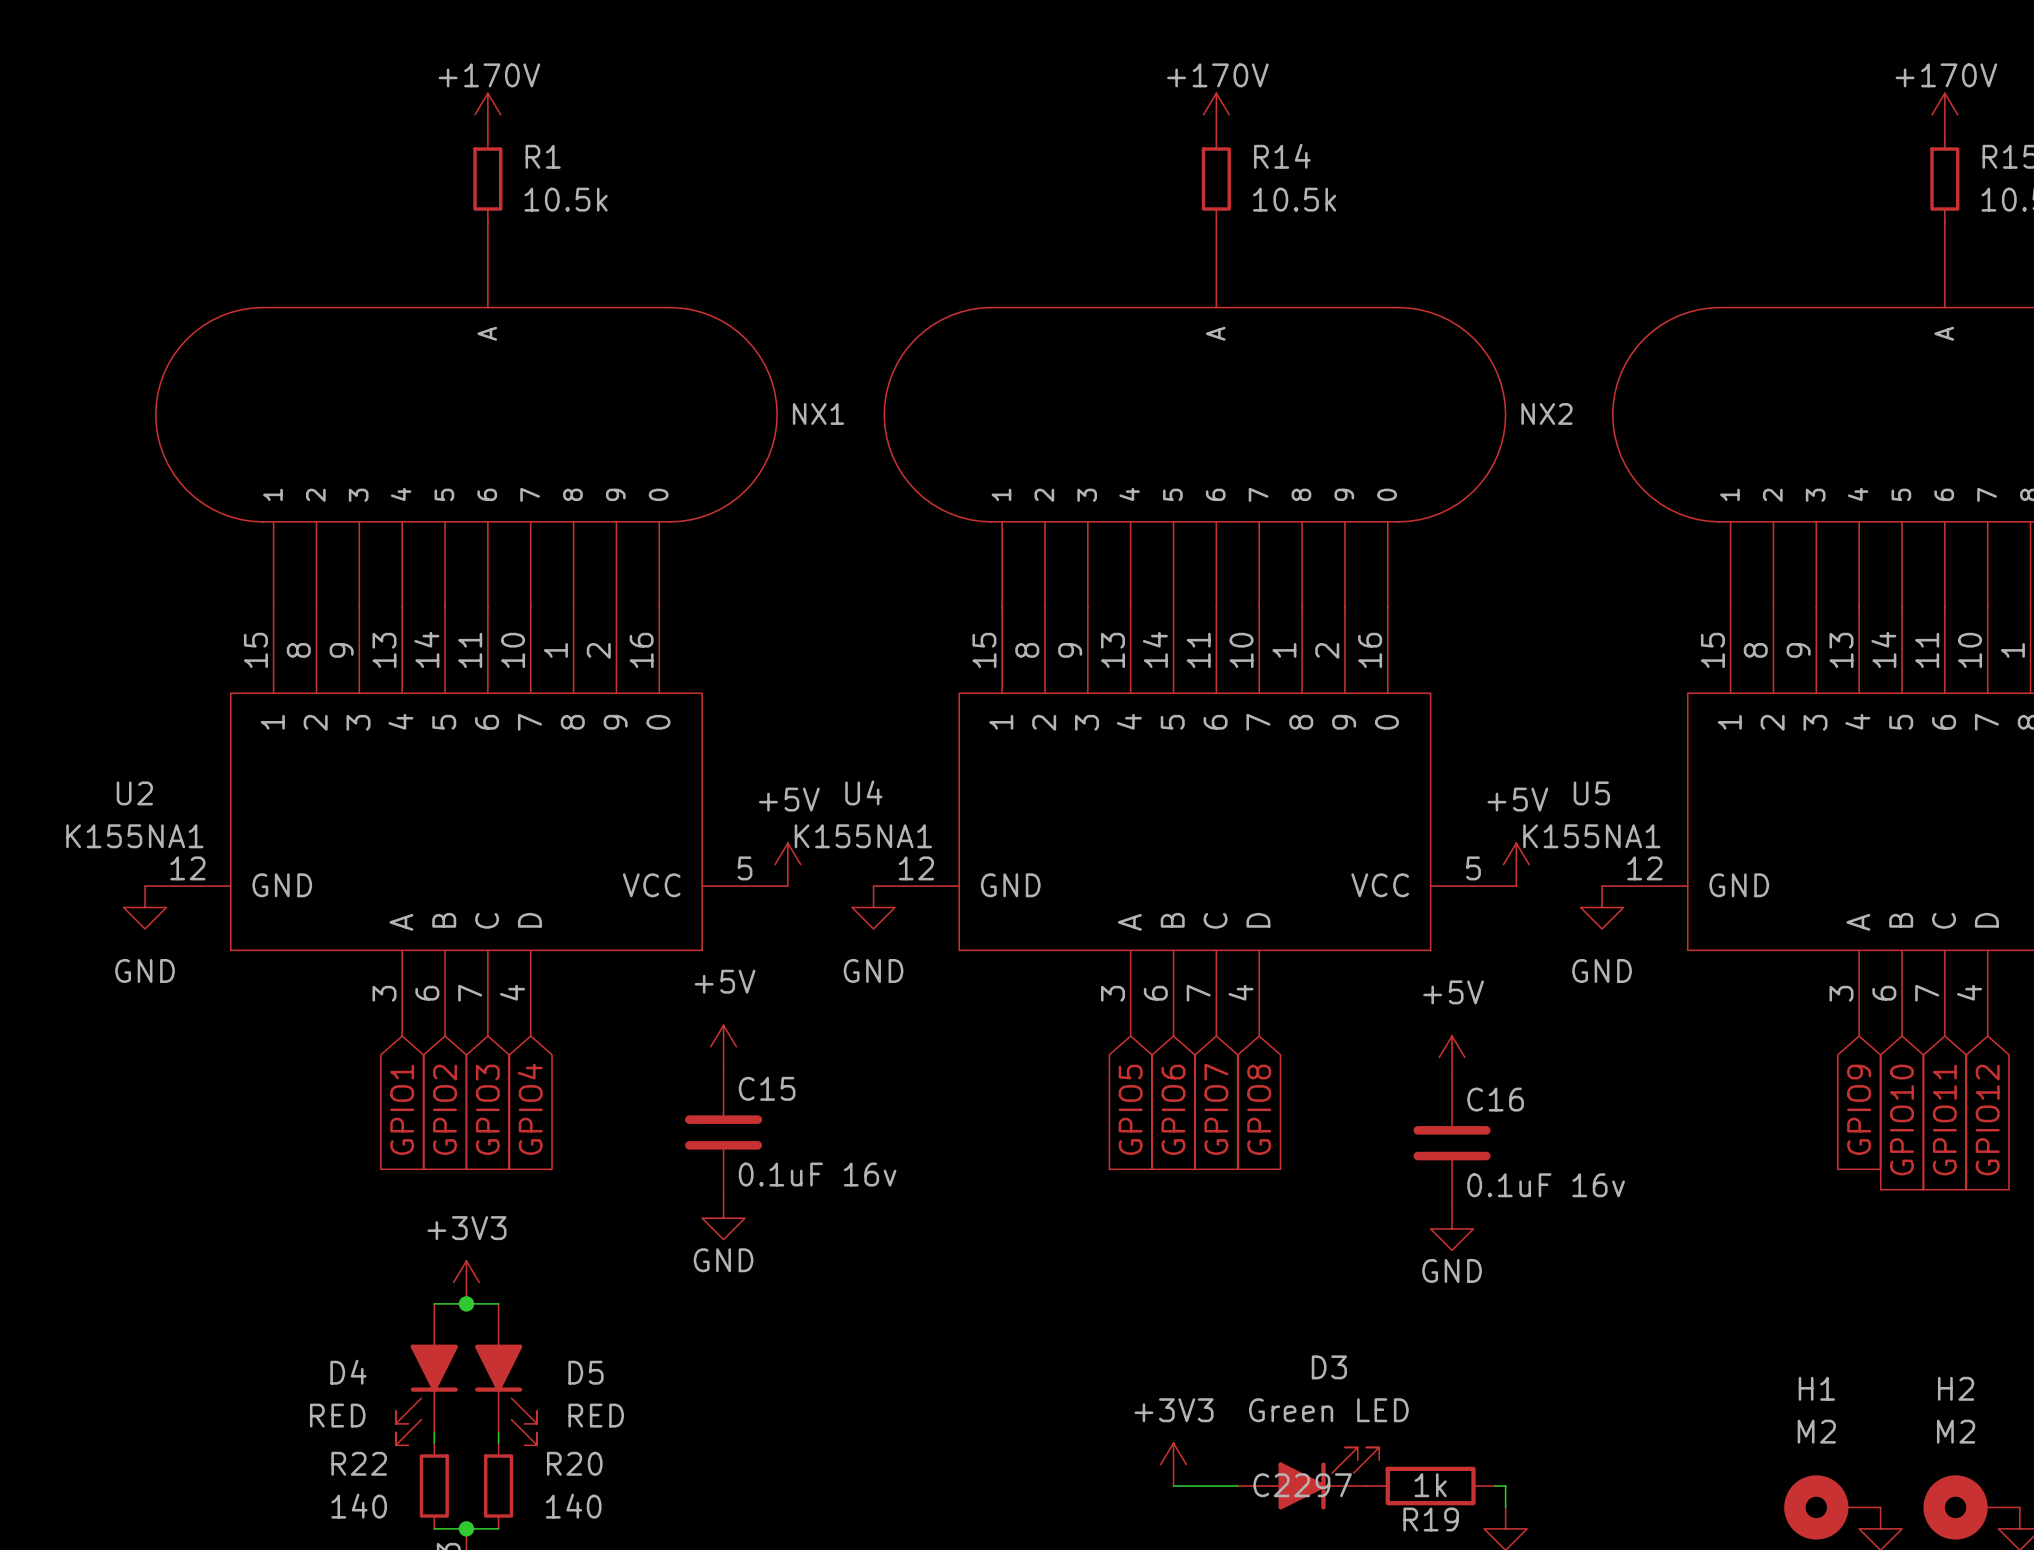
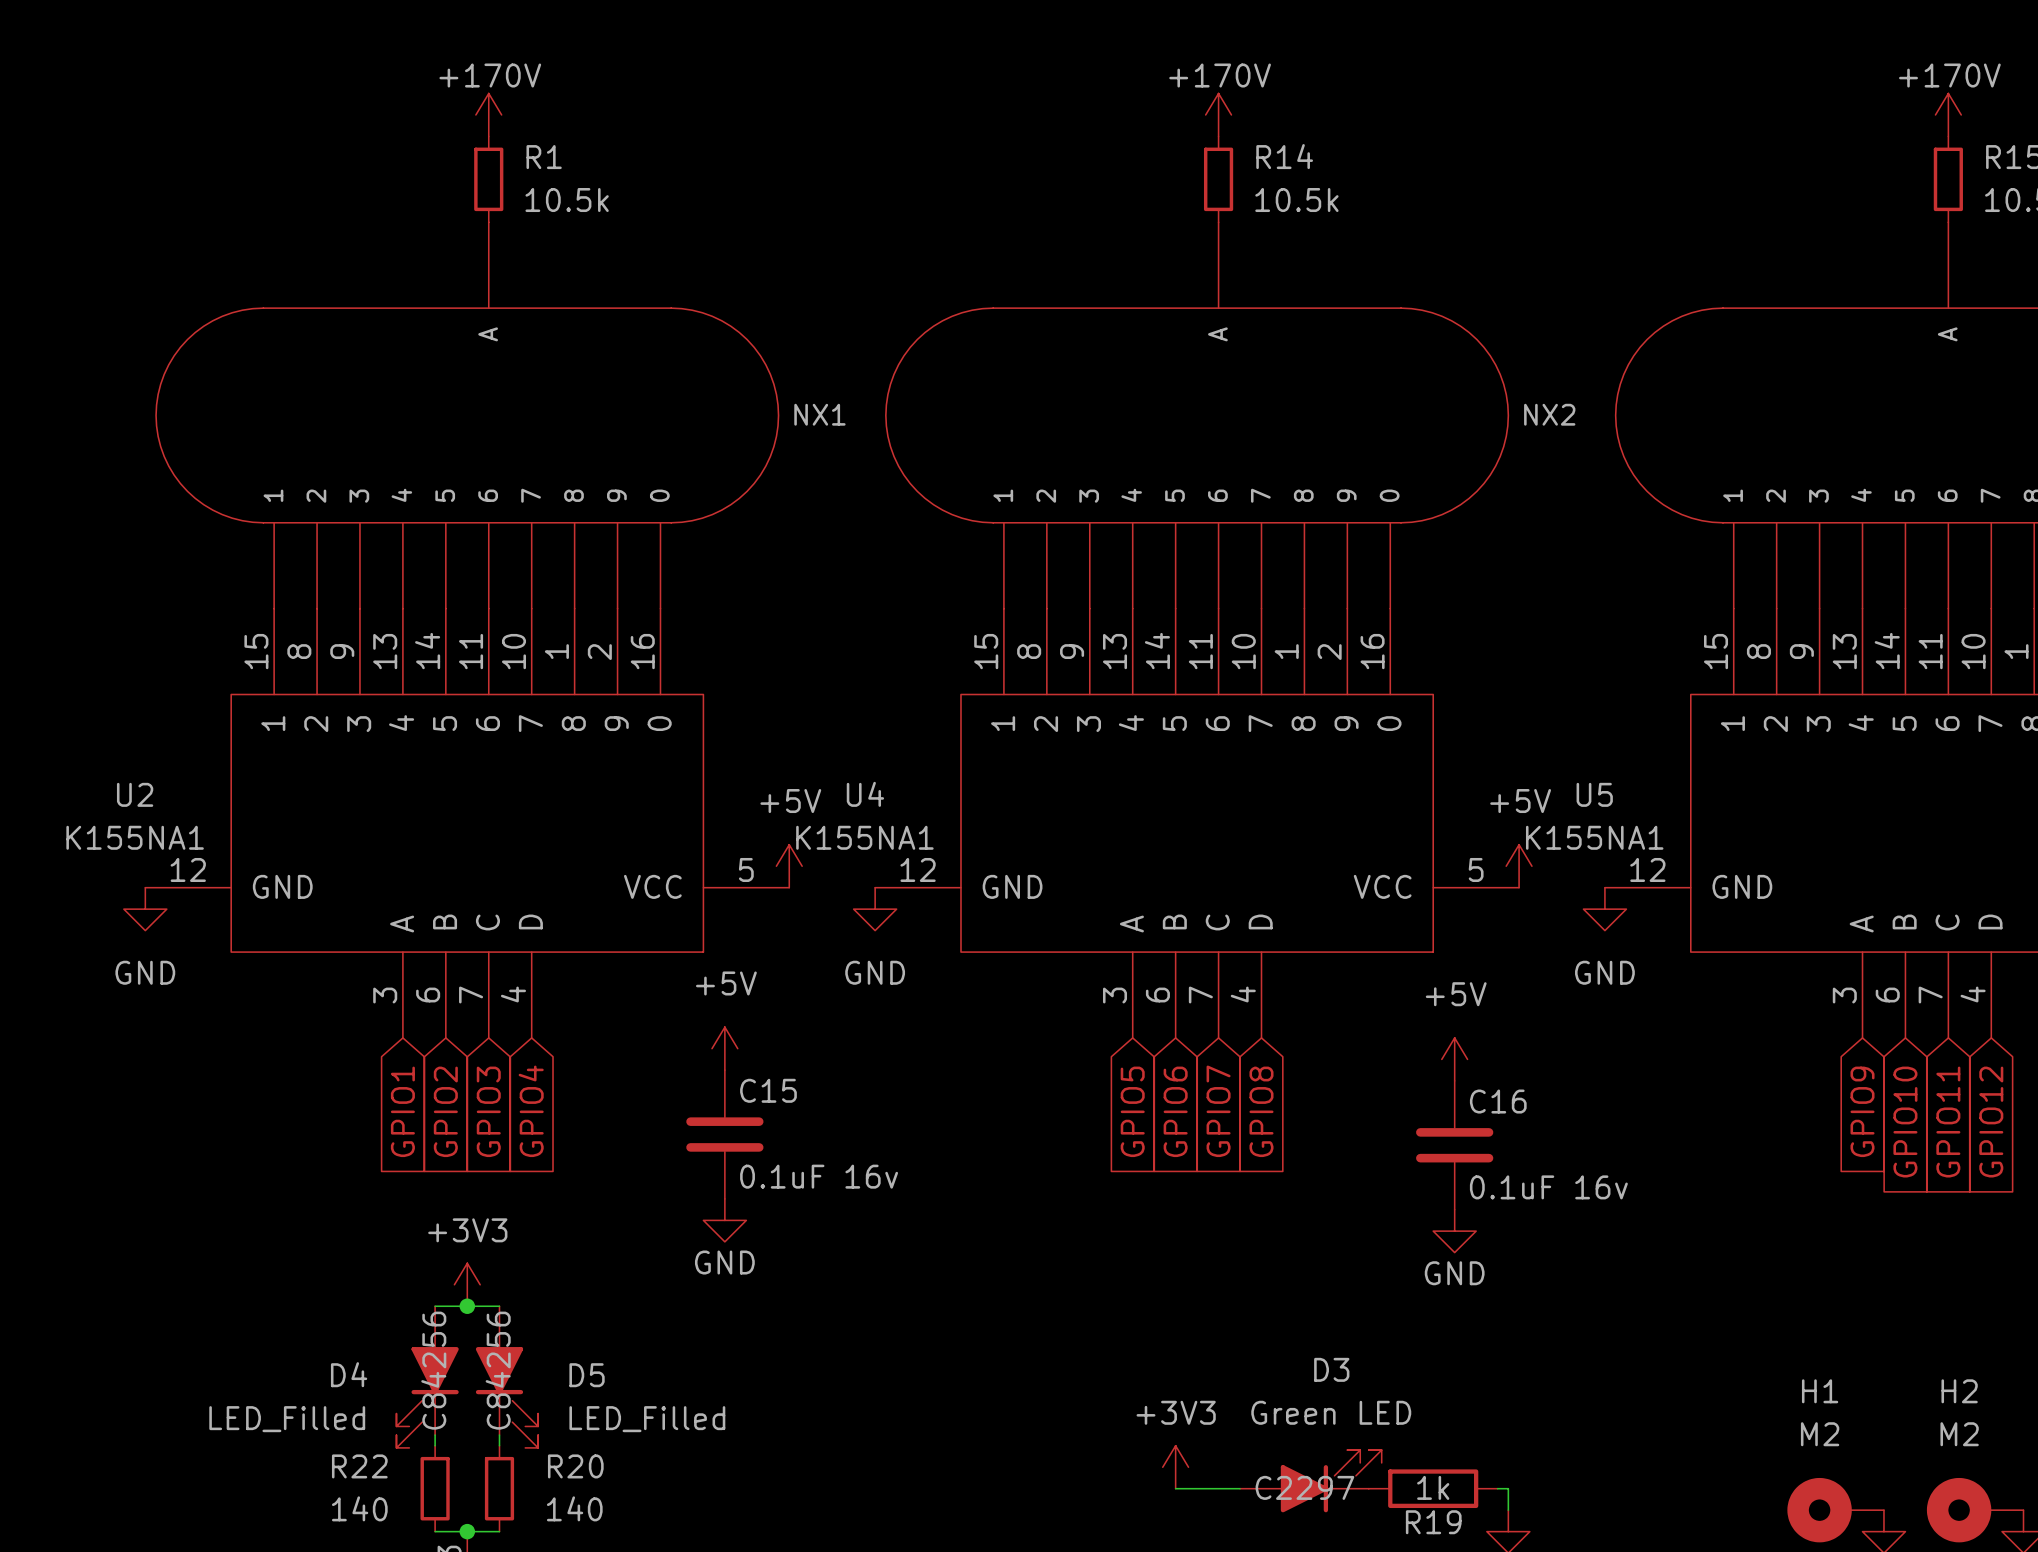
D4 text: none -> C84256 (433, 1370)
D5 text: none -> C84256 (498, 1370)
D4 value: RED (337, 1415) -> LED_Filled (287, 1419)
D5 value: RED (596, 1415) -> LED_Filled (647, 1419)

